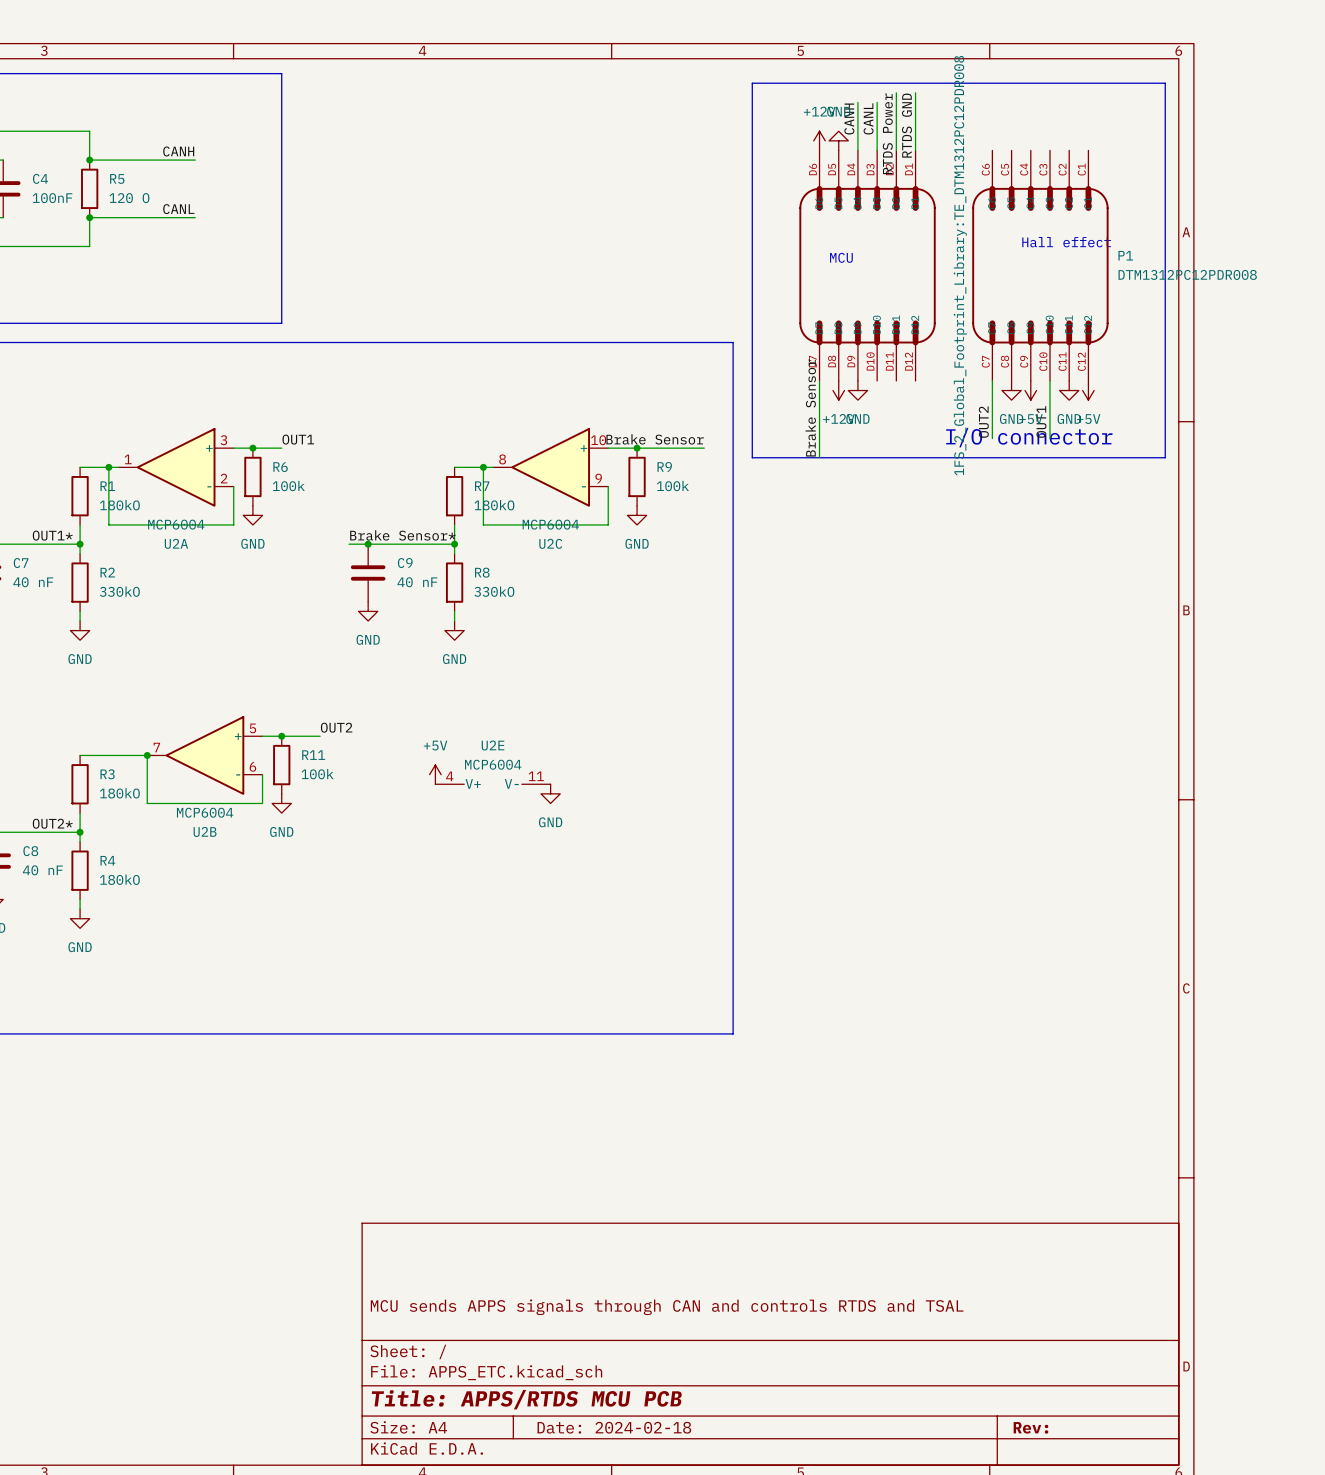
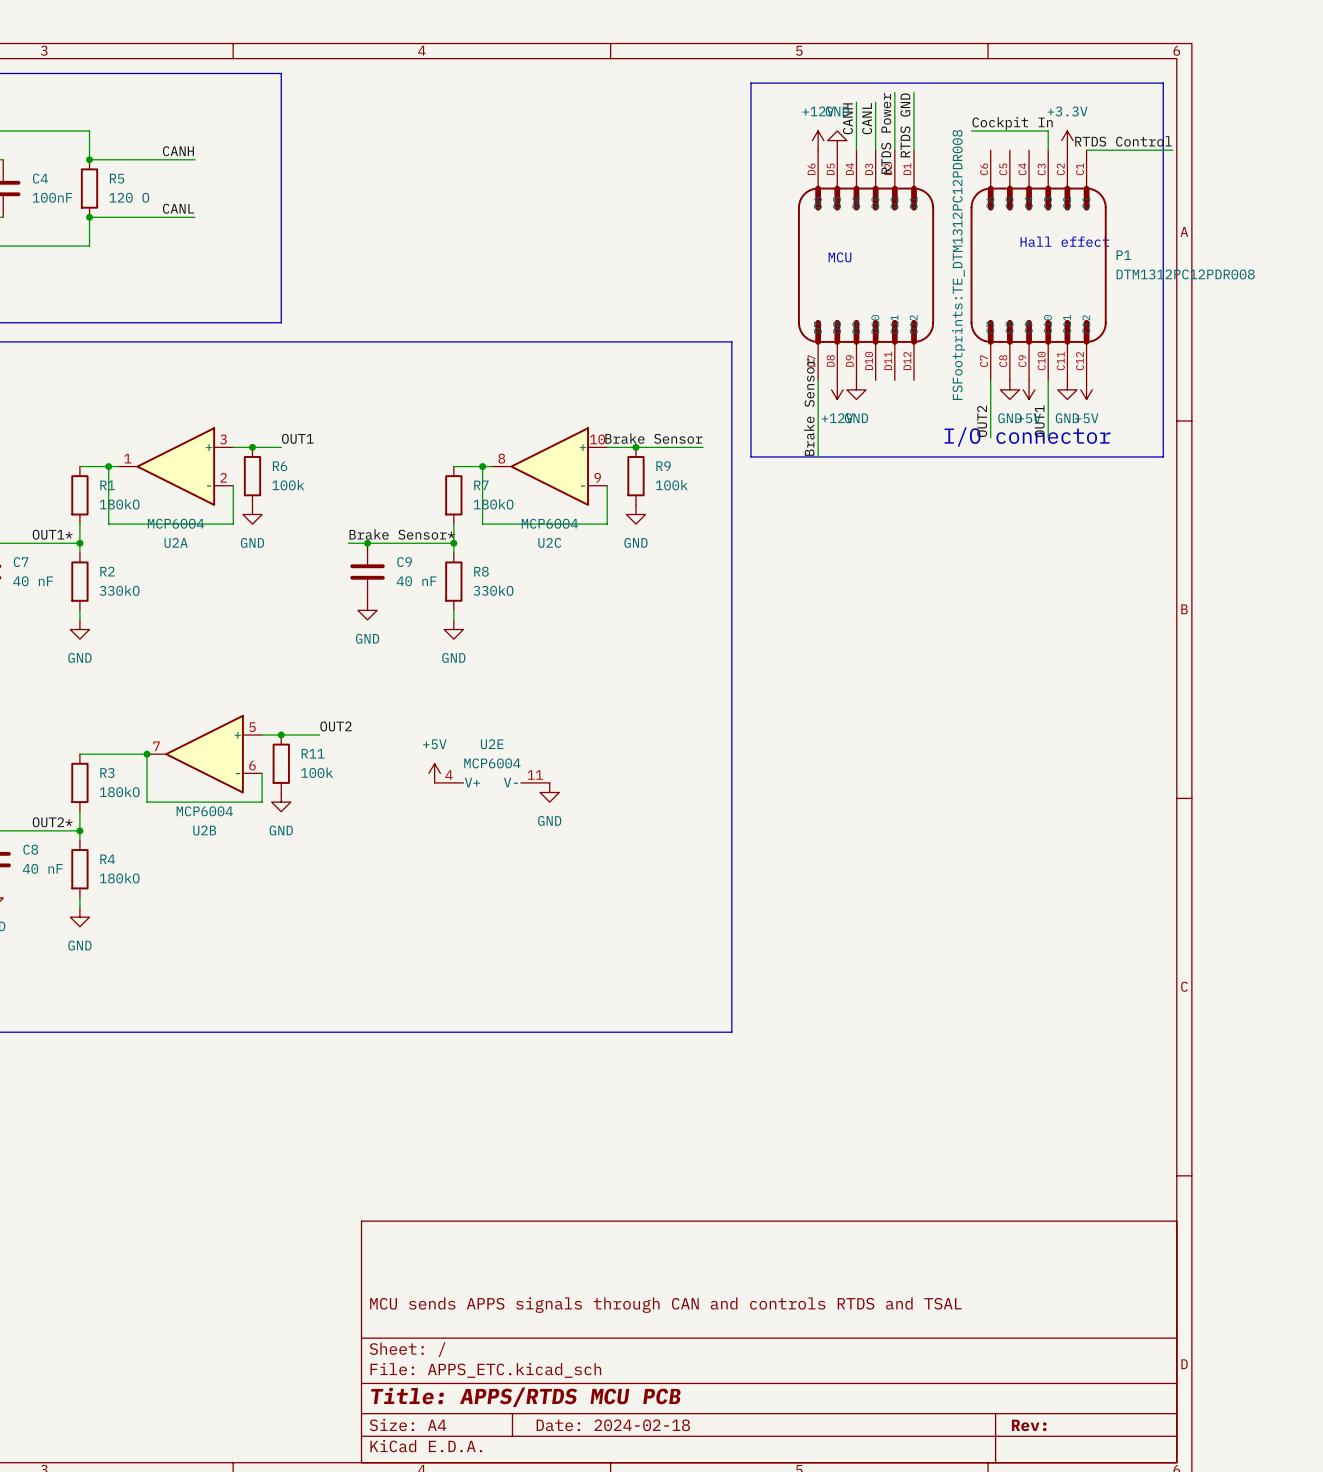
label: none -> Cockpit In (1012, 123)
wire: none -> (971, 131) (1048, 131) (1048, 150)
power symbol: none -> +3.3V (1067, 140)
label: none -> RTDS Control (1123, 141)
wire: none -> (1086, 150) (1172, 150)
P1 text: 1FS_2_Global_Footprint_Library:TE_DTM1312PC12PDR008 (960, 265) -> FSFootprints:TE_DTM1312PC12PDR008 (958, 264)

